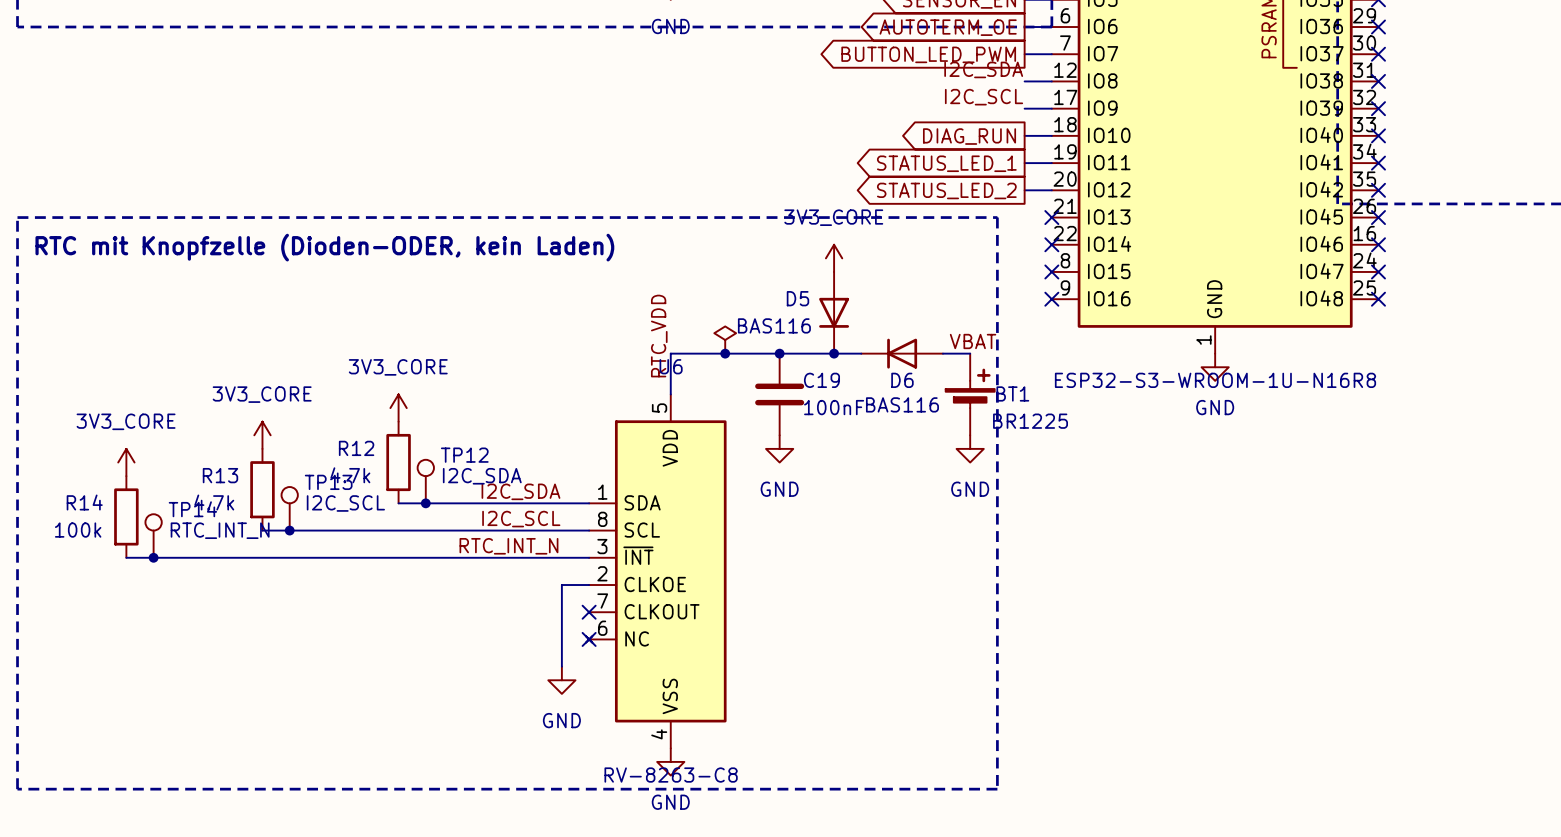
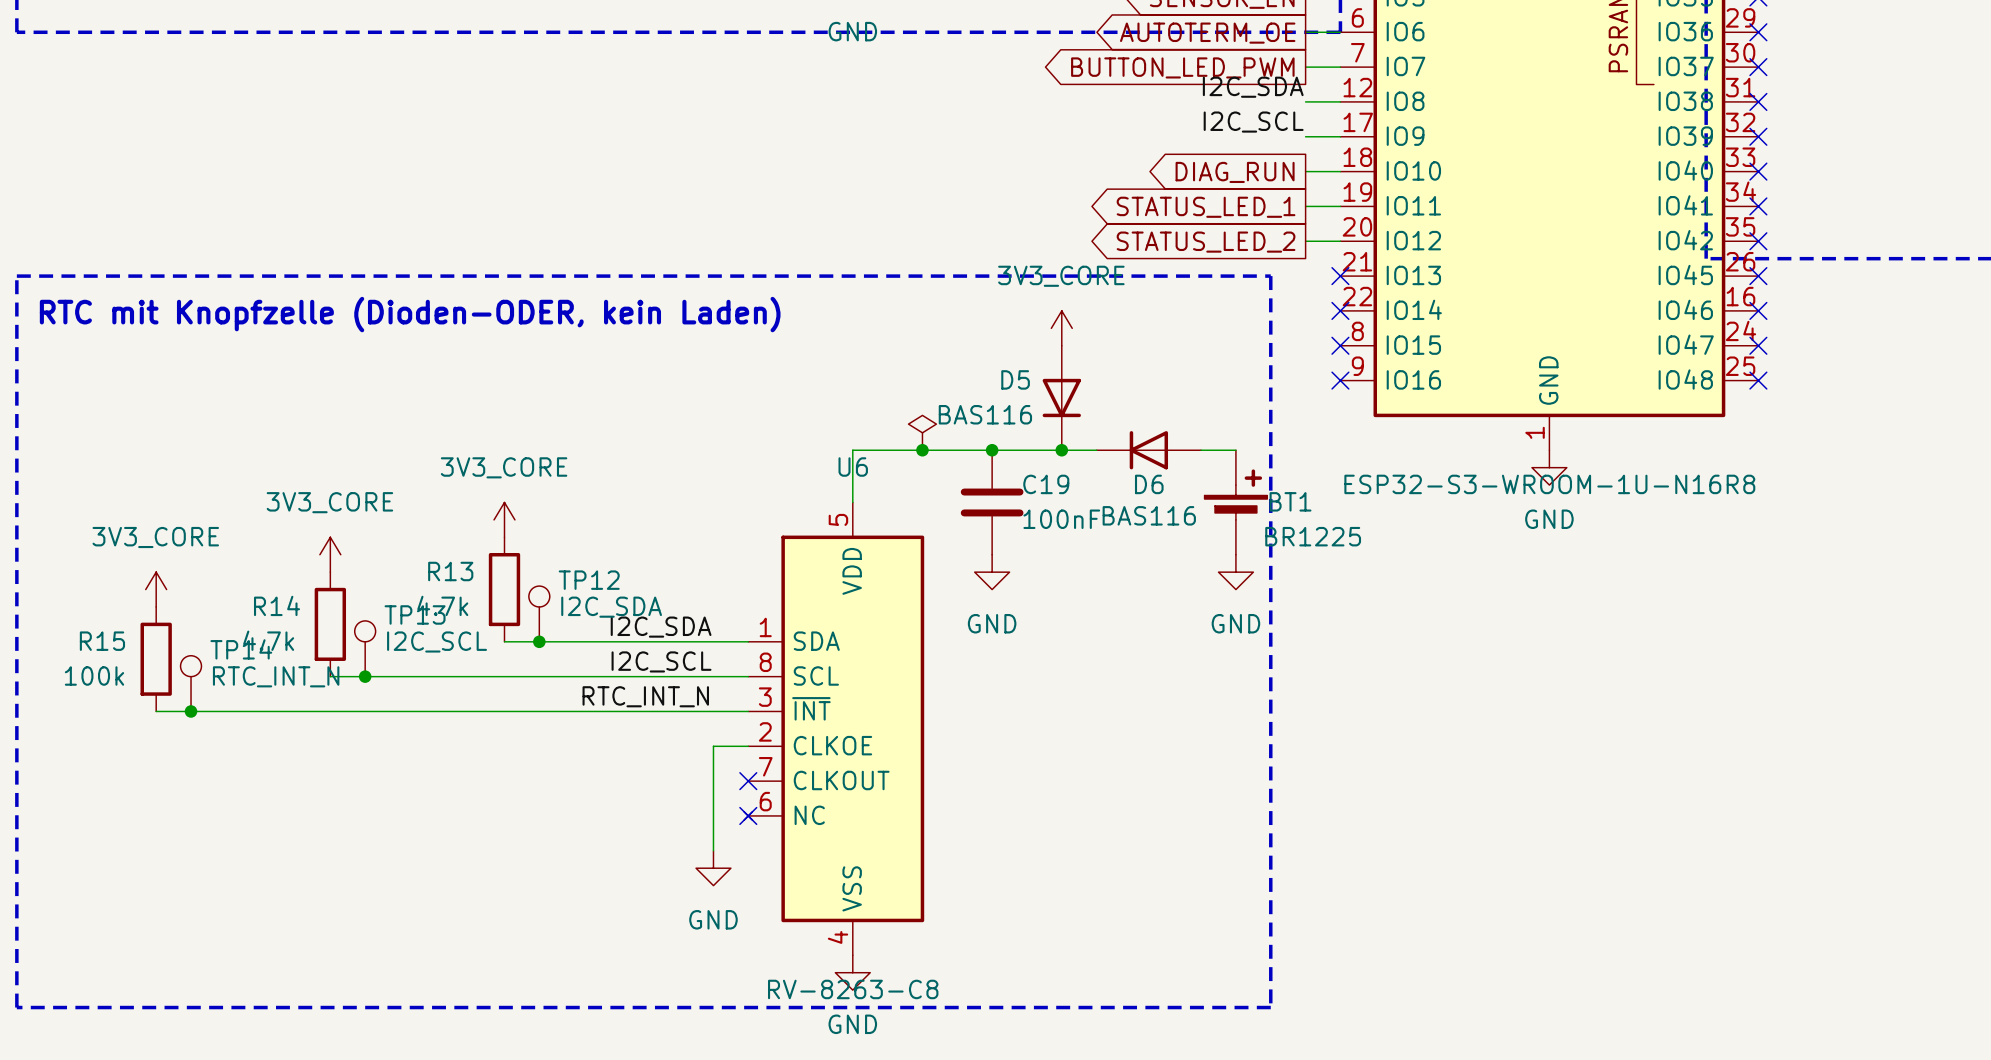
label: RTC_VDD (659, 336) -> none
label: VBAT (973, 341) -> none
R12 name: R12 (356, 448) -> R13 (450, 571)
R13 name: R13 (220, 475) -> R14 (277, 605)
R14 name: R14 (84, 502) -> R15 (102, 641)

